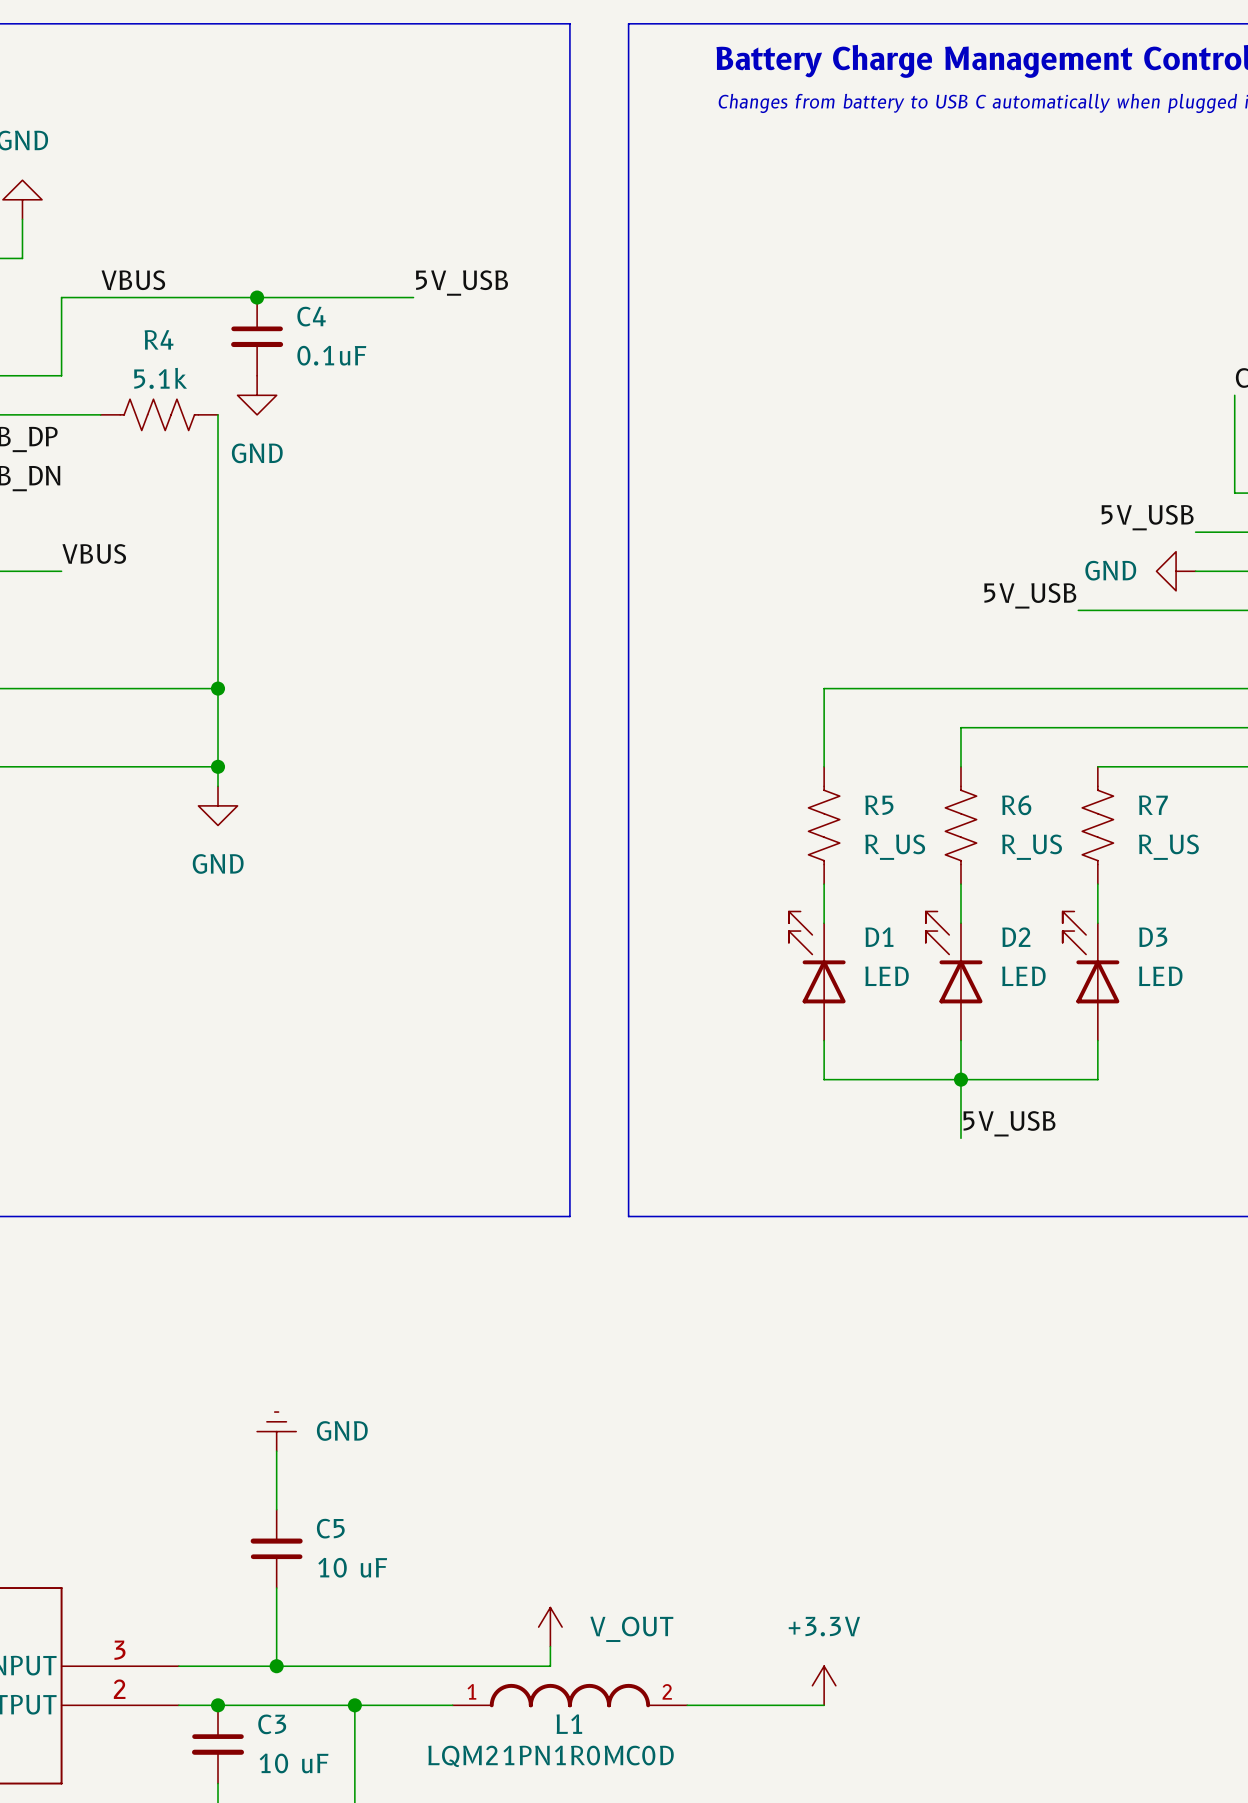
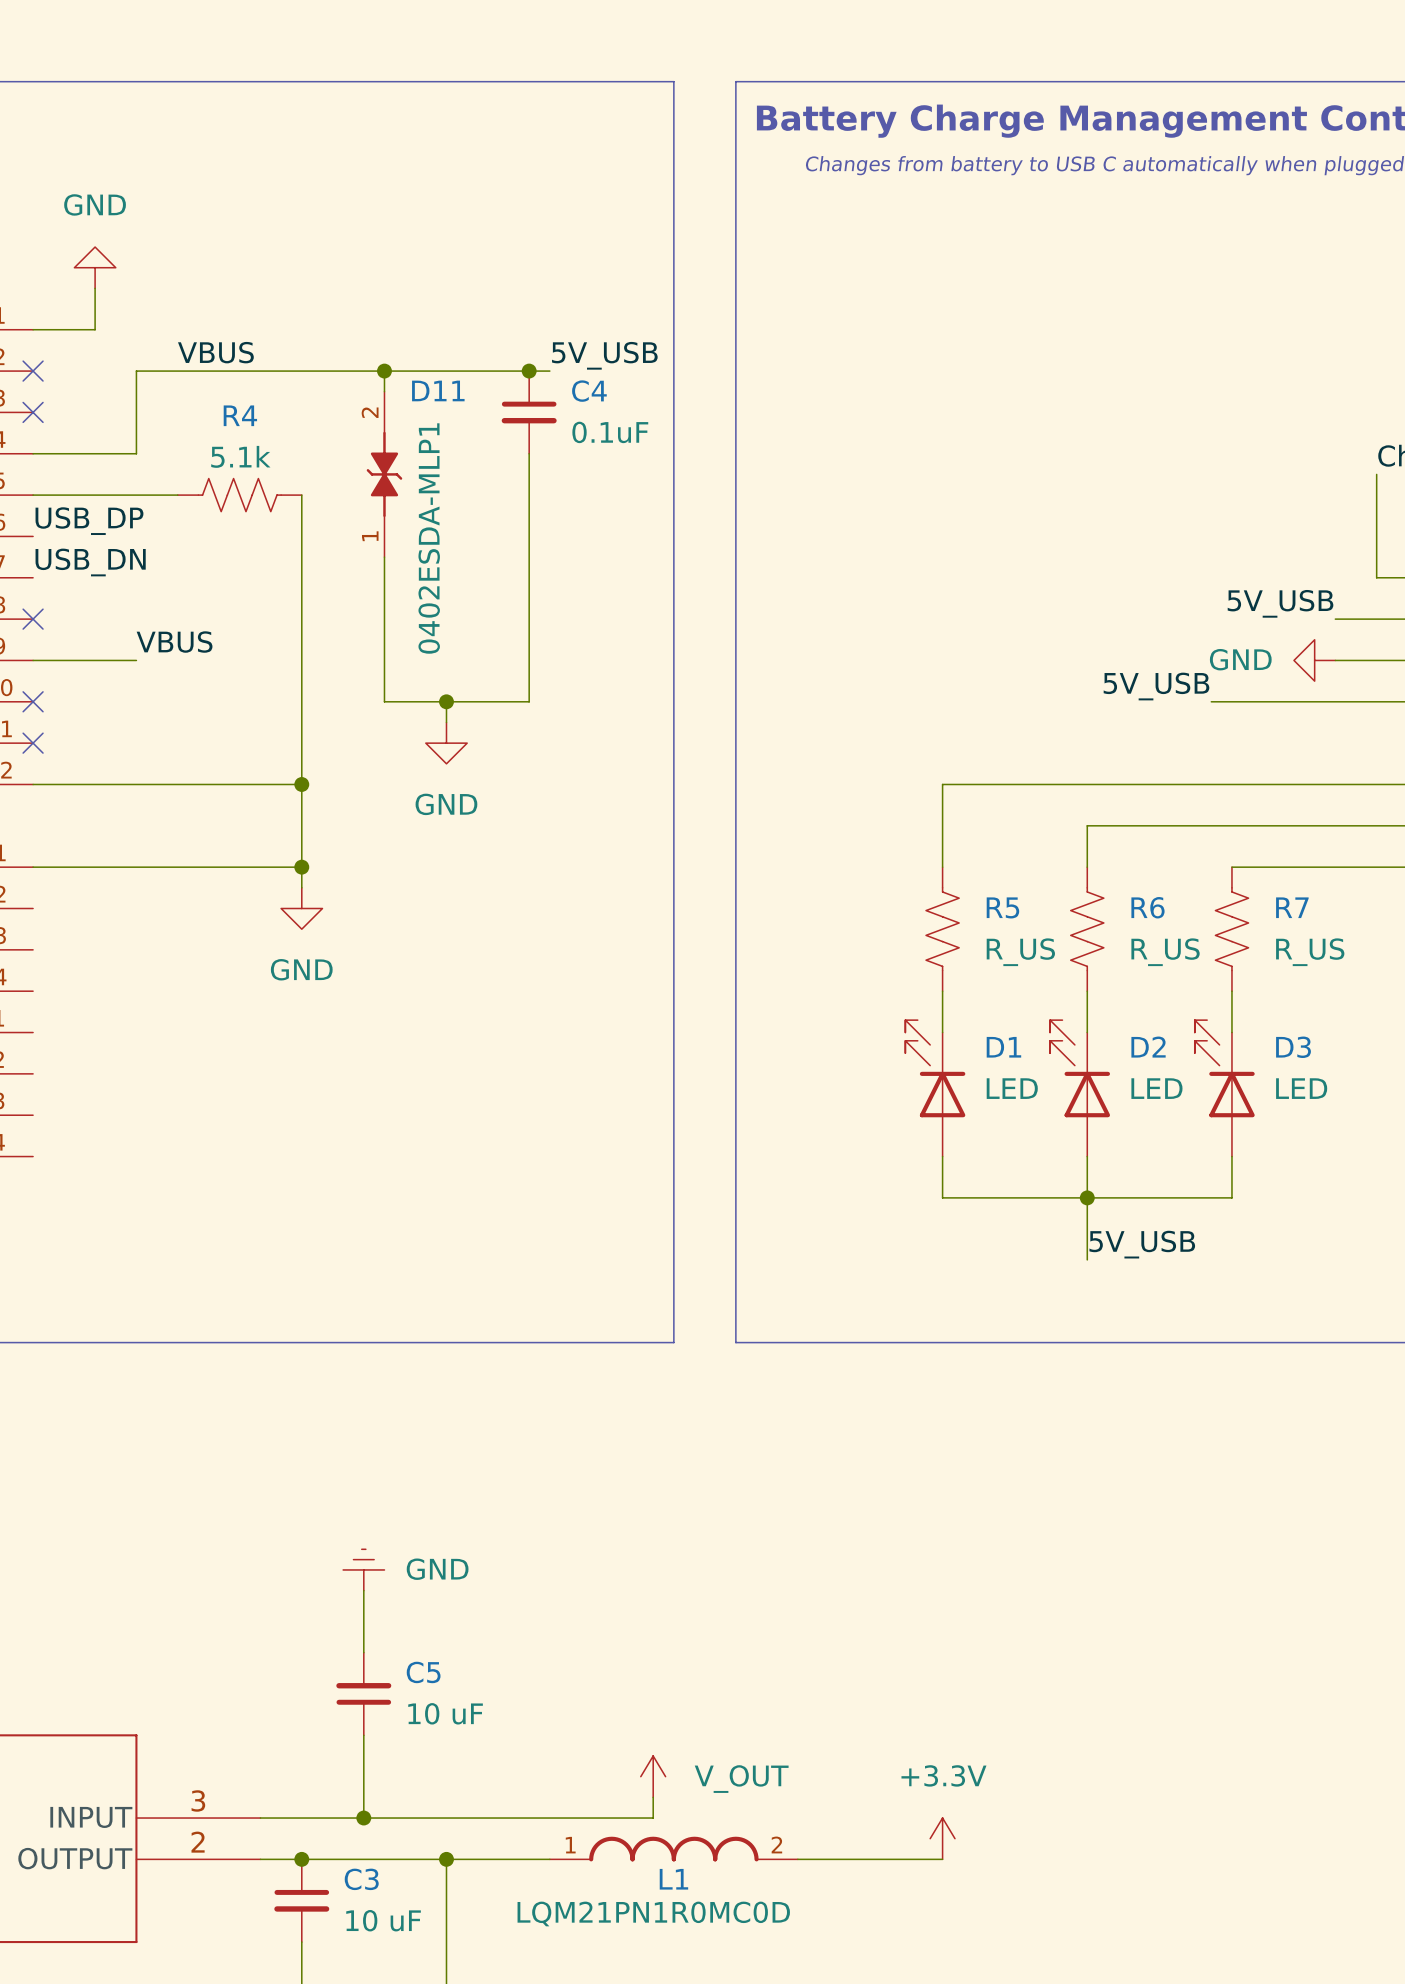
label position: 5V_USB (462, 283) -> 5V_USB (604, 355)
junction position: (257, 297) -> (384, 371)
wire: none -> (384, 371) (384, 391)
wire: none -> (508, 371) (549, 371)
junction: none -> (529, 371)
C4 position: (257, 336) -> (529, 412)
wire: none -> (529, 453) (529, 701) (384, 701) (384, 557)
power symbol position: GND (257, 395) -> GND (446, 743)
D11: none -> 0402ESDA-MLP1 (384, 474)
wire: none -> (446, 701) (446, 722)
junction: none -> (446, 701)

